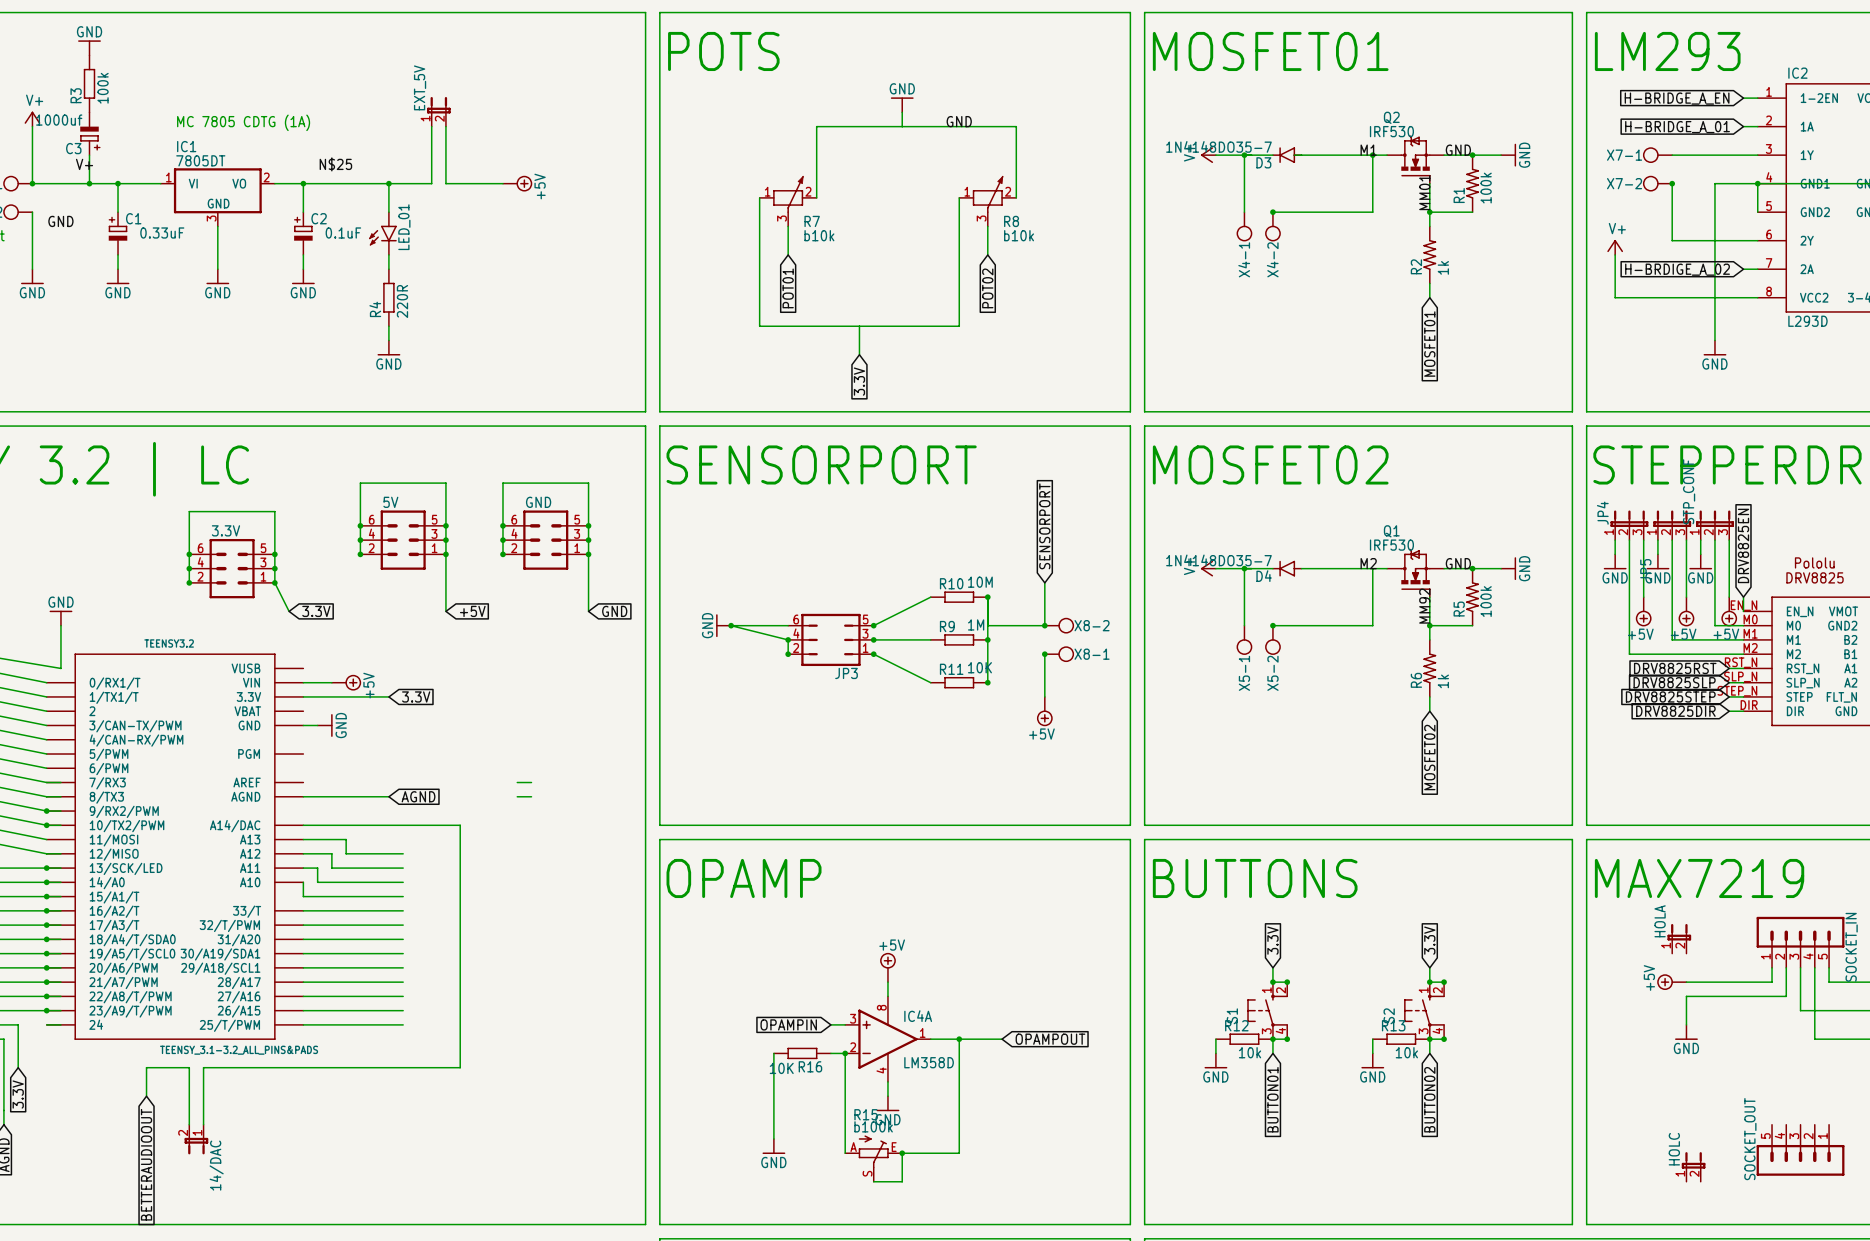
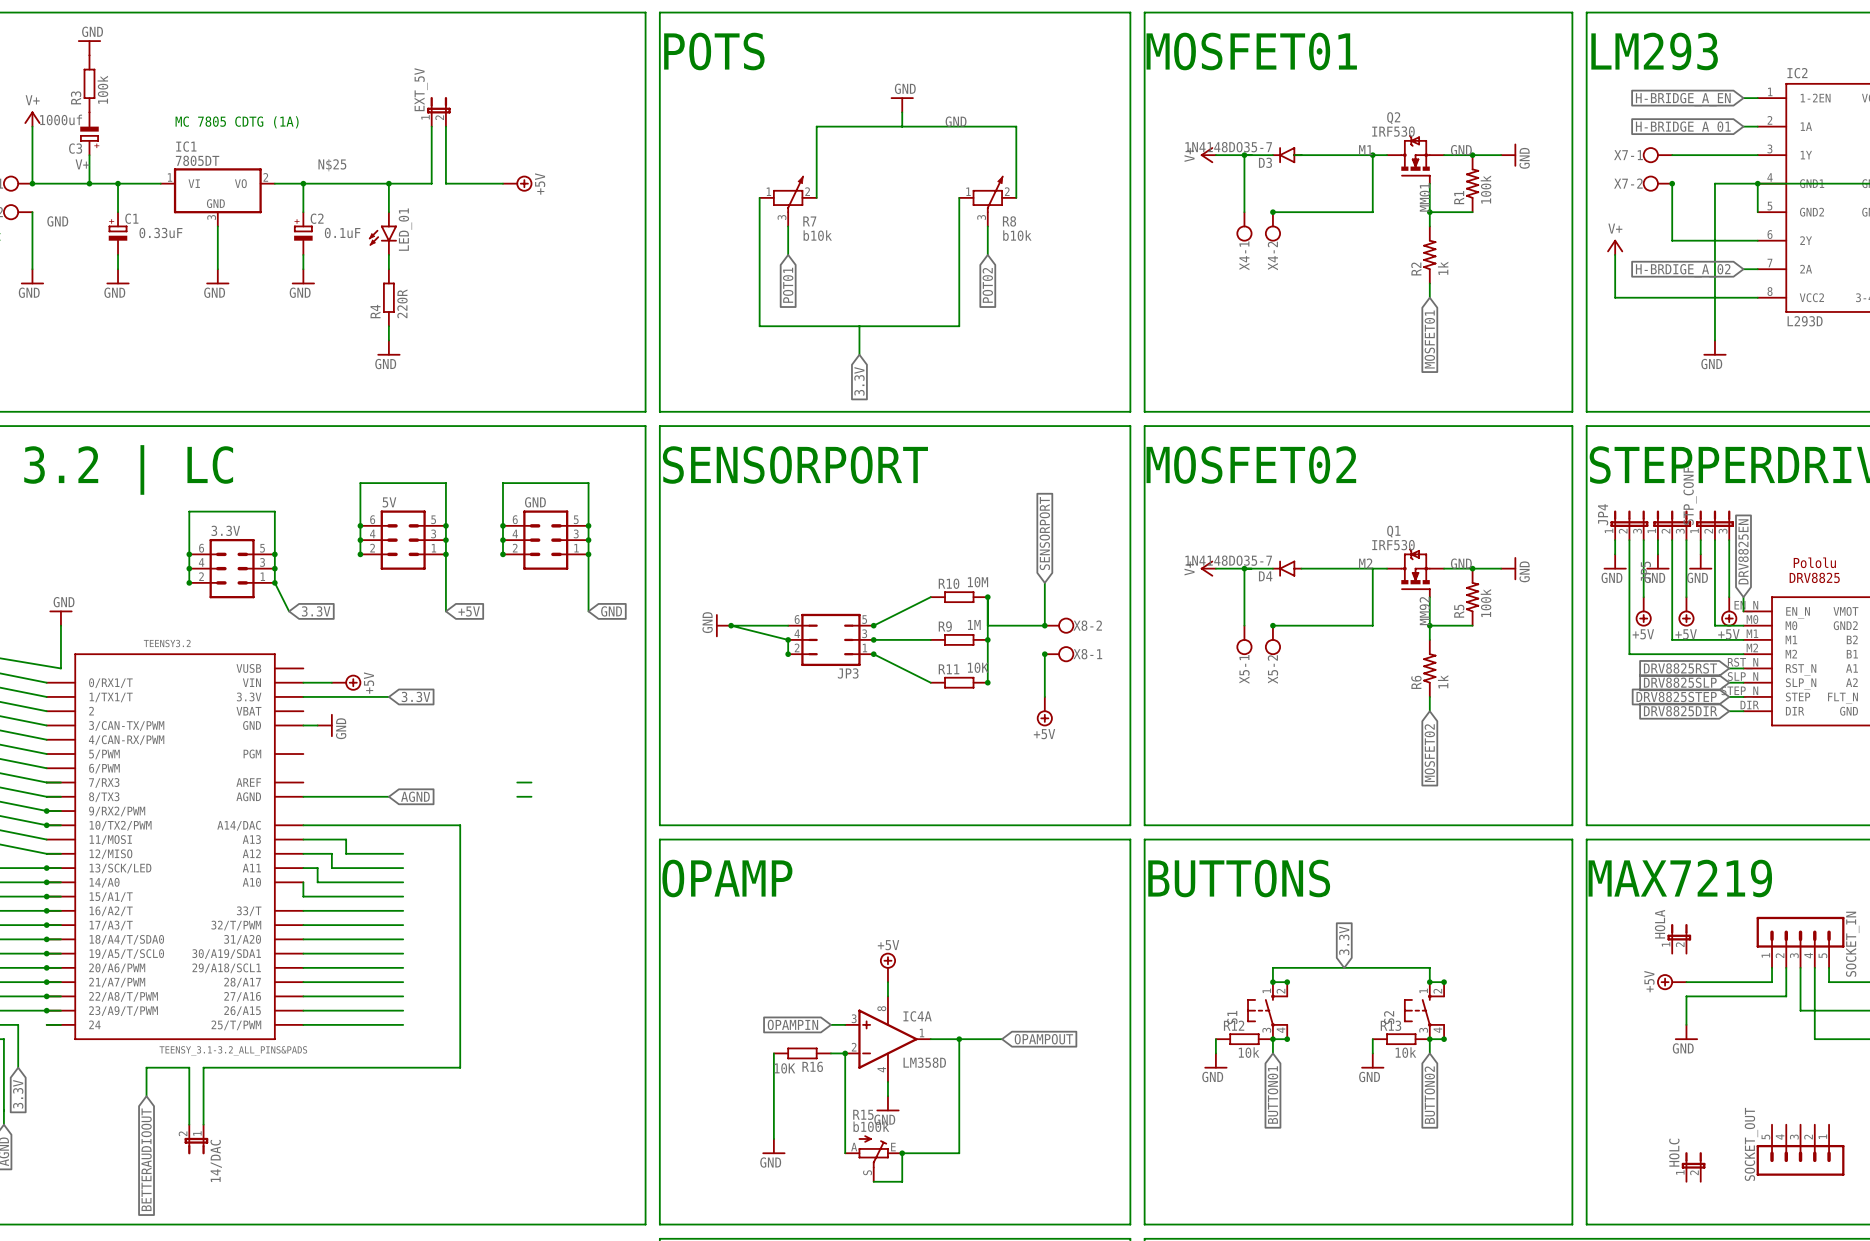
global label: 3.3V (1272, 940) -> none
global label: none -> 3.3V (1344, 940)
global label: 3.3V (1429, 940) -> none
wire: none -> (1272, 967) (1429, 967)

